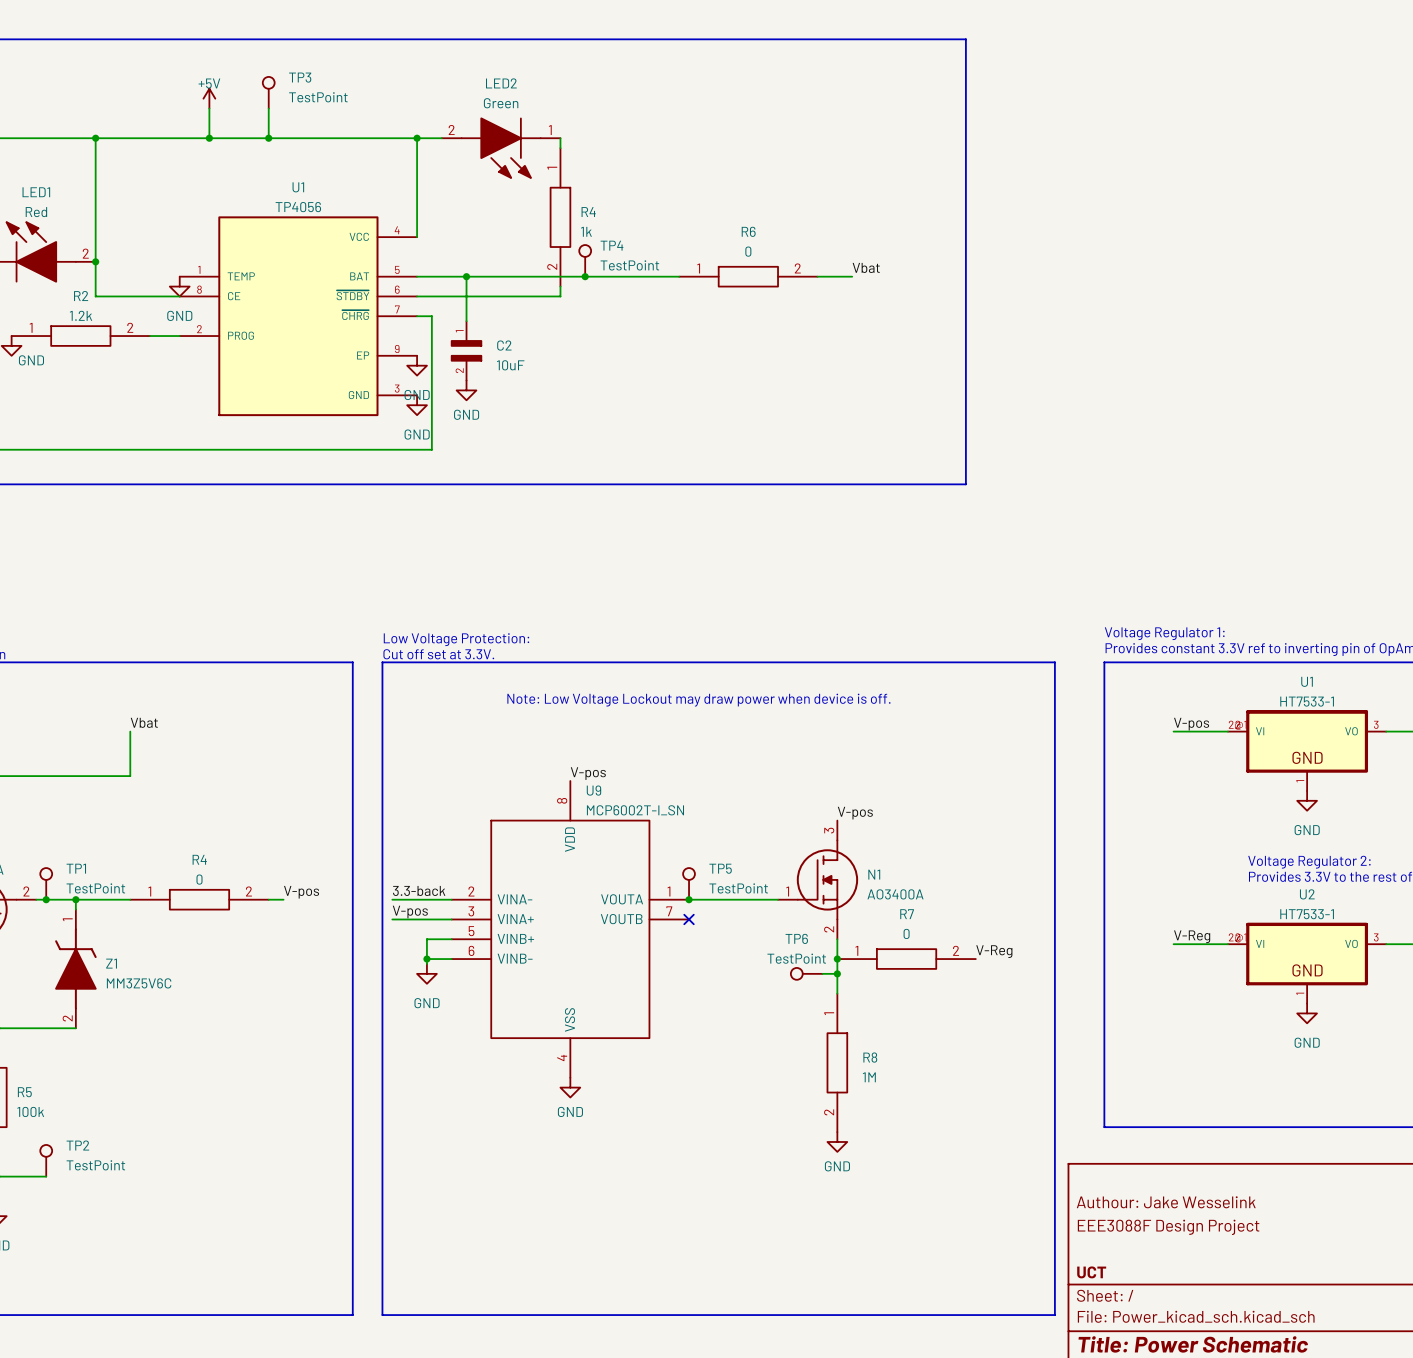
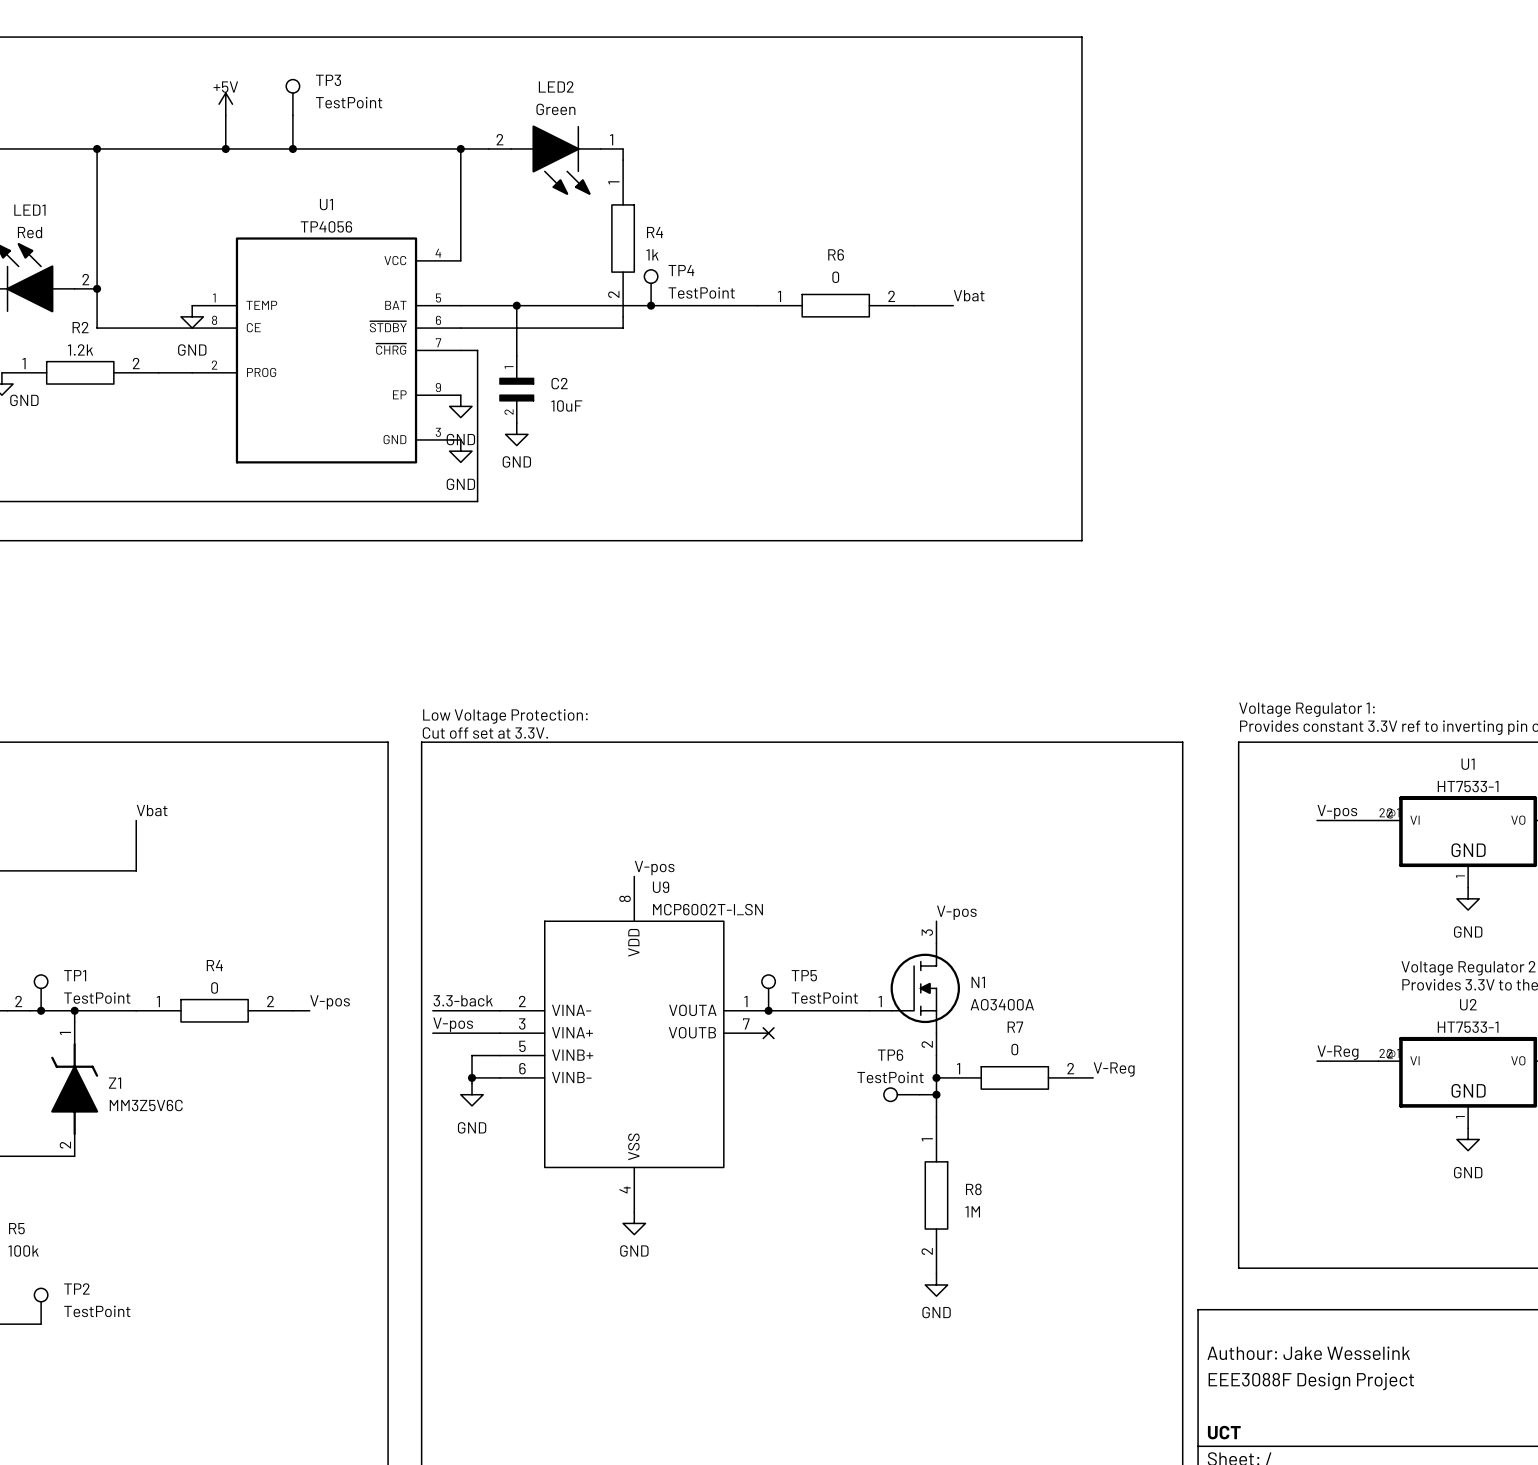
text: Note: Low Voltage Lockout may draw power when device is off. (698, 700) -> none

